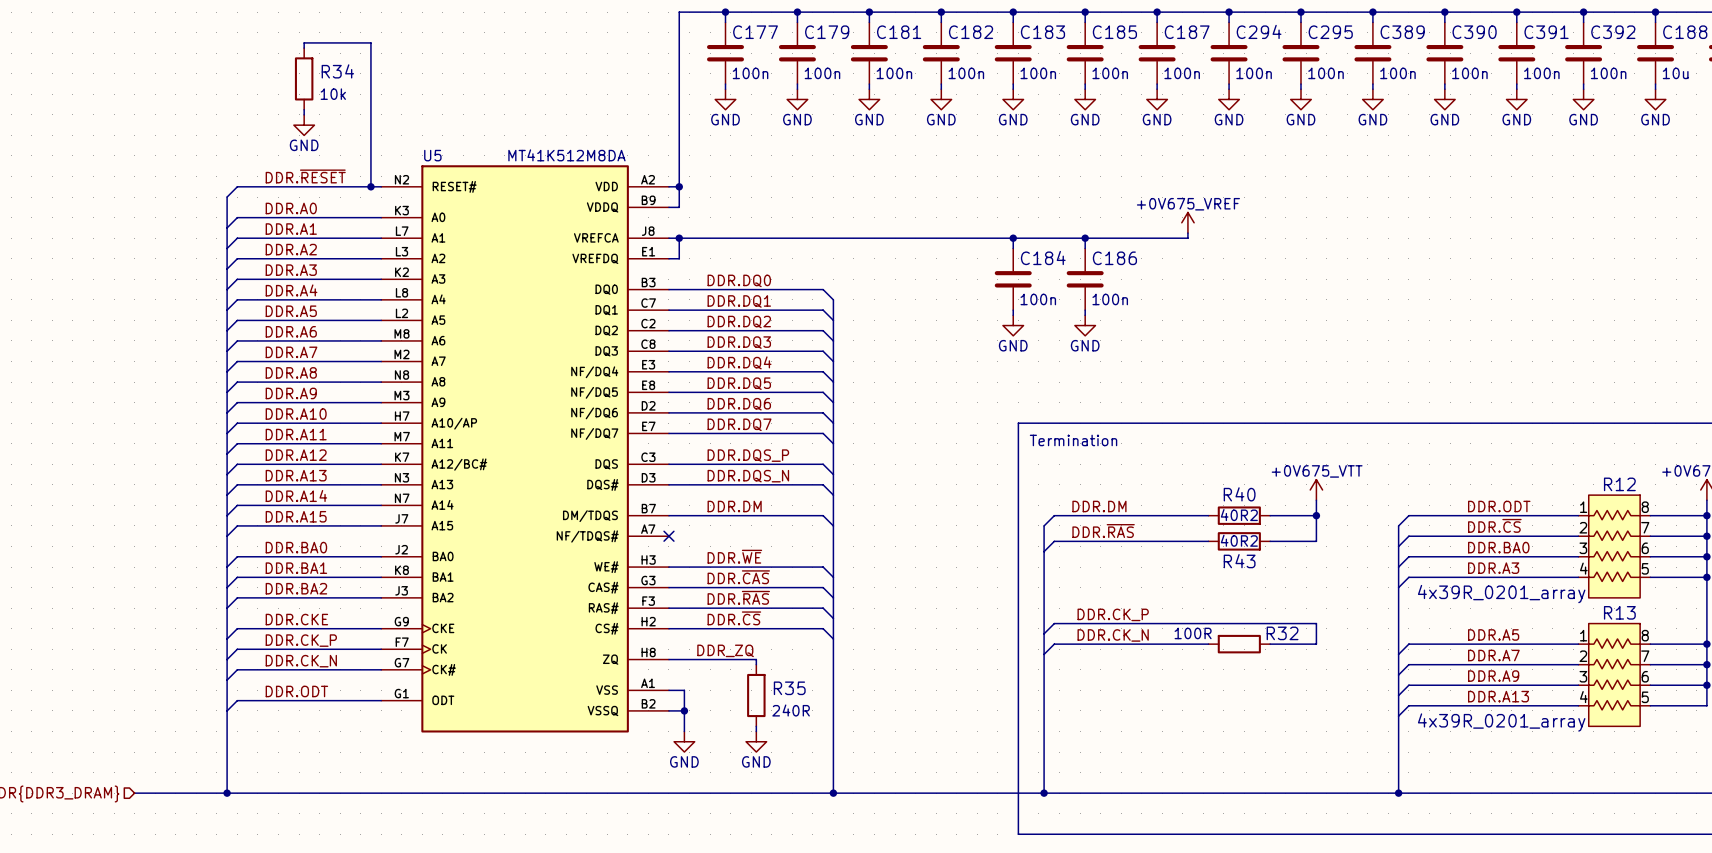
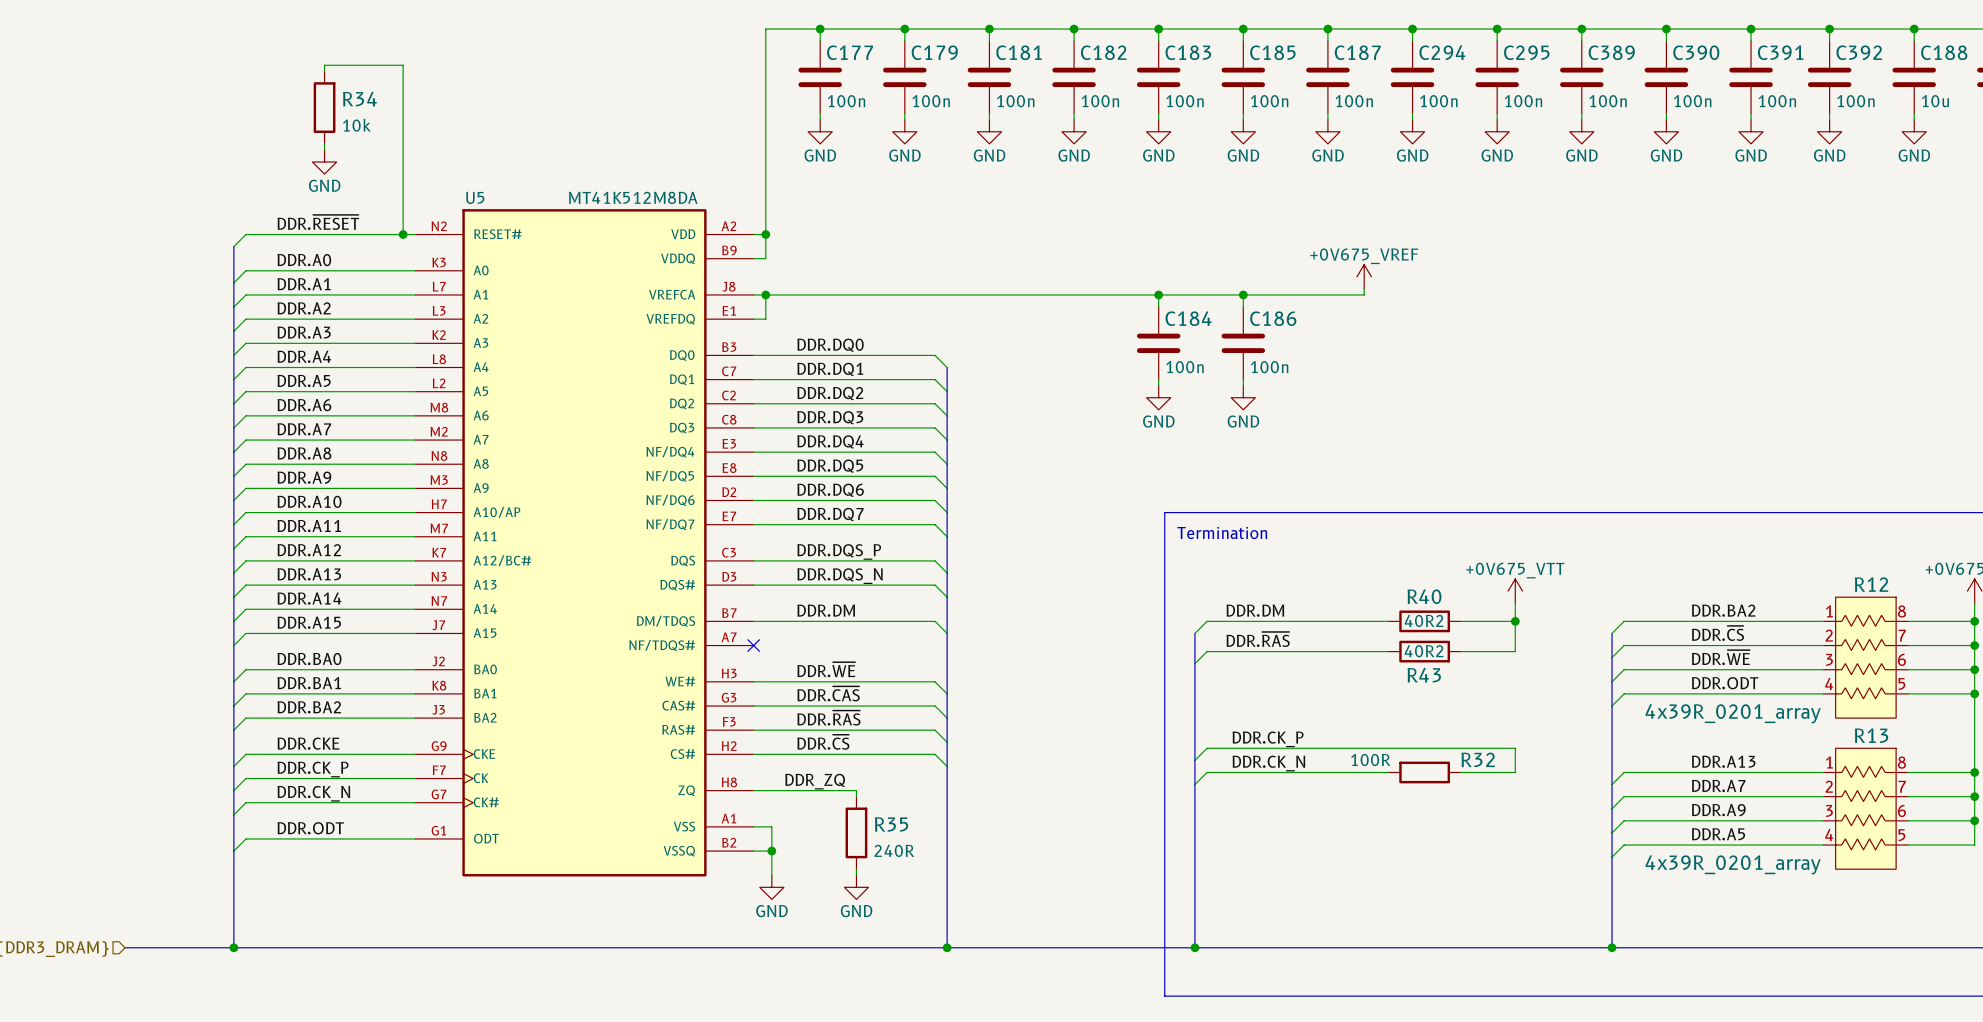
label: DDR.ODT (1499, 506) -> DDR.BA2 (1723, 610)
label: DDR.BA0 (1498, 547) -> DDR.~{WE} (1720, 657)
label: DDR.A3 (1493, 568) -> DDR.ODT (1725, 683)
label: DDR.A5 (1493, 634) -> DDR.A13 (1723, 761)
label: DDR.A13 (1498, 696) -> DDR.A5 (1718, 834)

